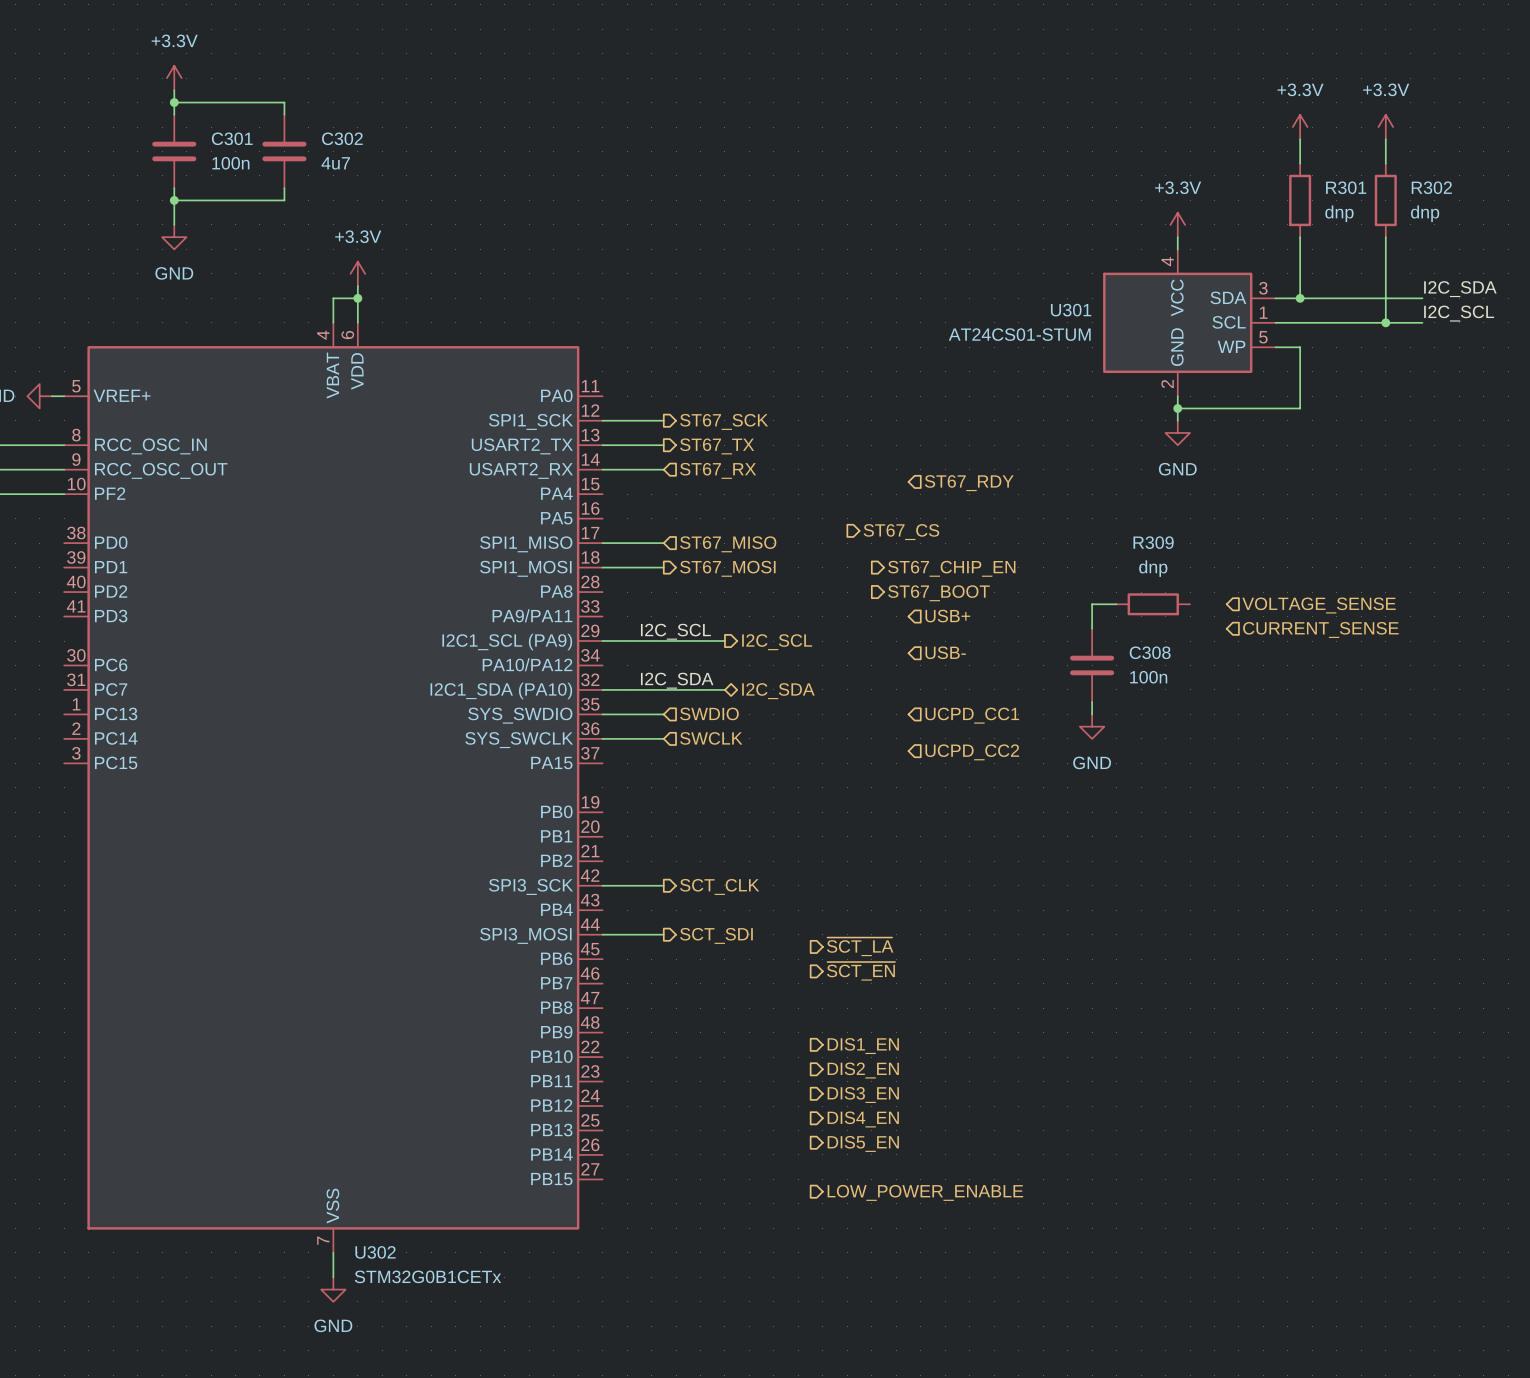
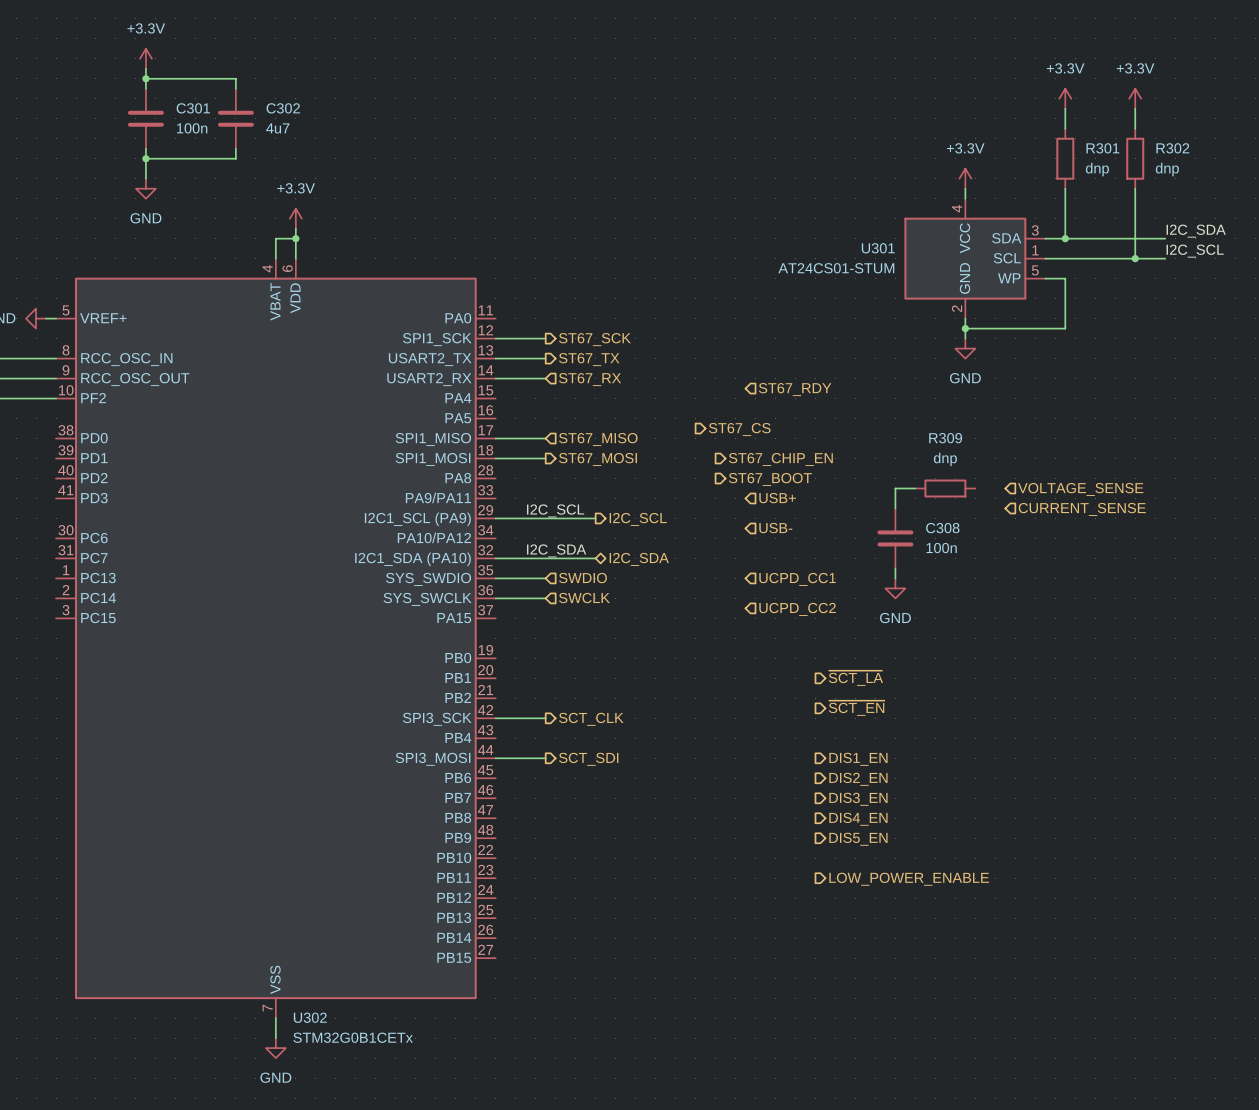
hierarchical label position: ~{SCT_LA} (860, 946) -> ~{SCT_LA} (855, 678)
hierarchical label position: ~{SCT_EN} (861, 971) -> ~{SCT_EN} (856, 708)
hierarchical label position: DIS1_EN (863, 1046) -> DIS1_EN (858, 759)
hierarchical label position: DIS2_EN (863, 1070) -> DIS2_EN (858, 779)
hierarchical label position: DIS3_EN (863, 1095) -> DIS3_EN (858, 799)
hierarchical label position: DIS4_EN (863, 1119) -> DIS4_EN (858, 819)
hierarchical label position: DIS5_EN (863, 1143) -> DIS5_EN (858, 839)
hierarchical label position: LOW_POWER_ENABLE (925, 1192) -> LOW_POWER_ENABLE (909, 879)

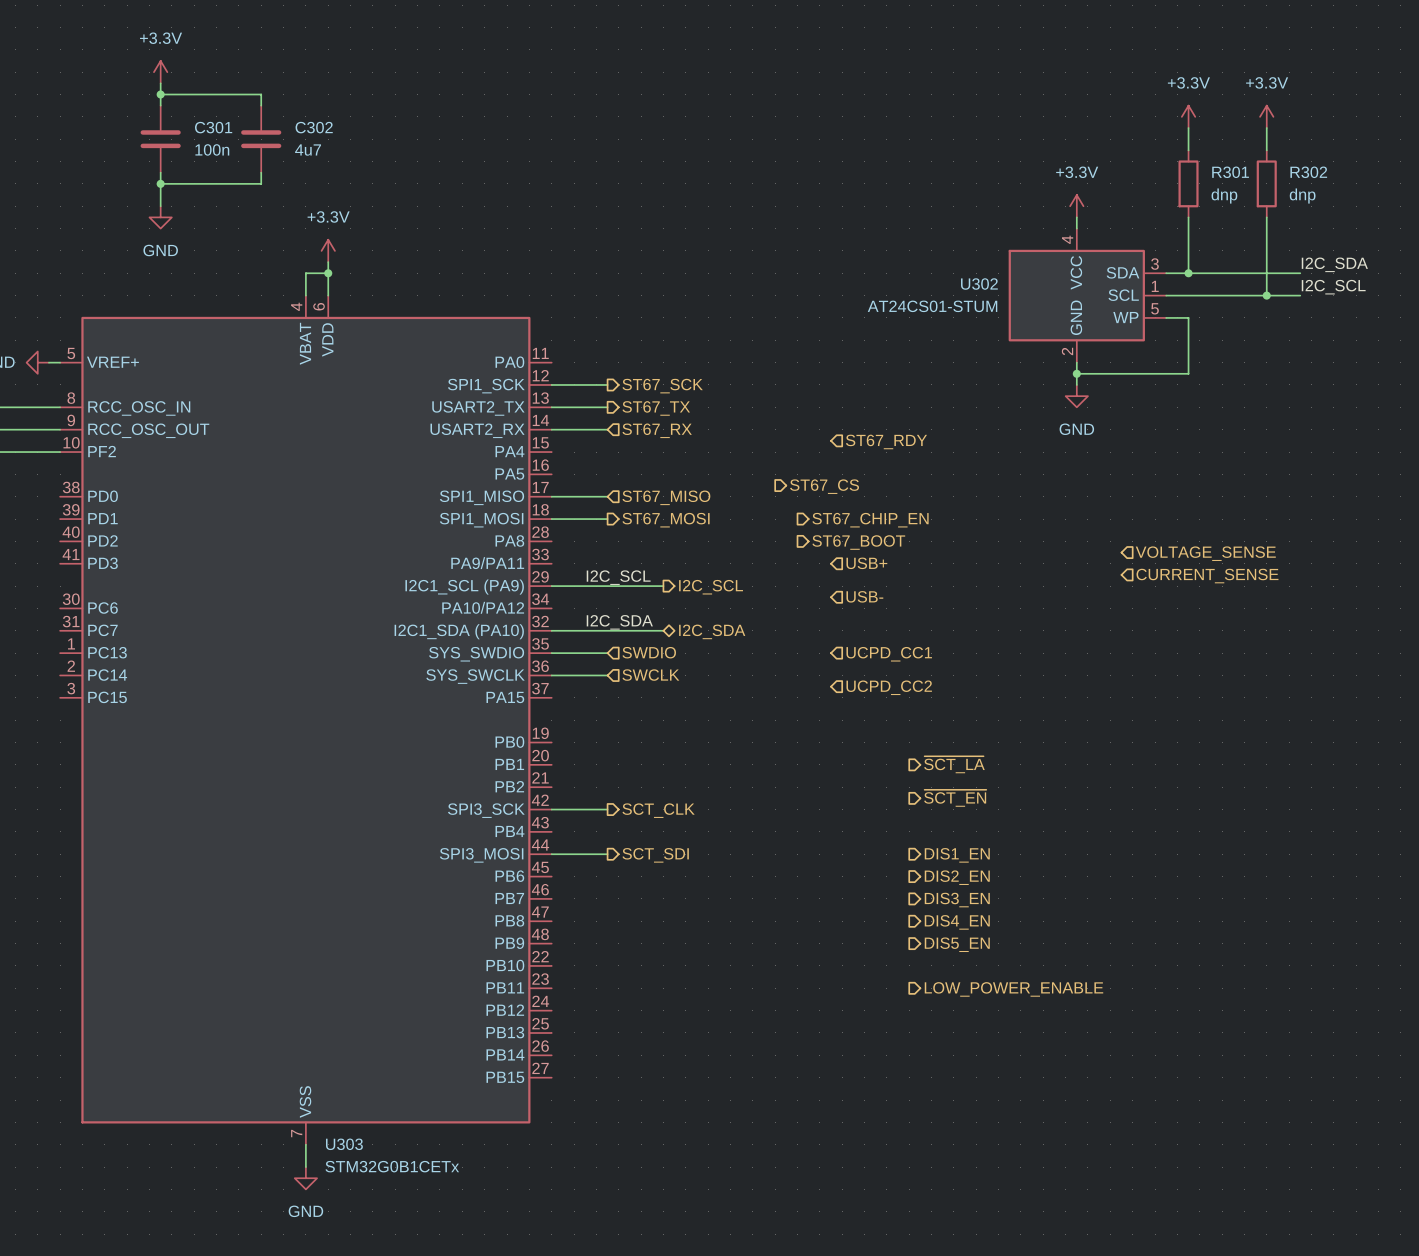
U301 name: U301 (878, 248) -> U302 (979, 284)
wire: (915, 488) (895, 488) (895, 508) -> none
R309: dnp (945, 488) -> none
C308: 100n (895, 538) -> none
wire: (895, 568) (895, 578) -> none
power symbol: GND (895, 588) -> none
U302 name: U302 (310, 1017) -> U303 (344, 1144)

